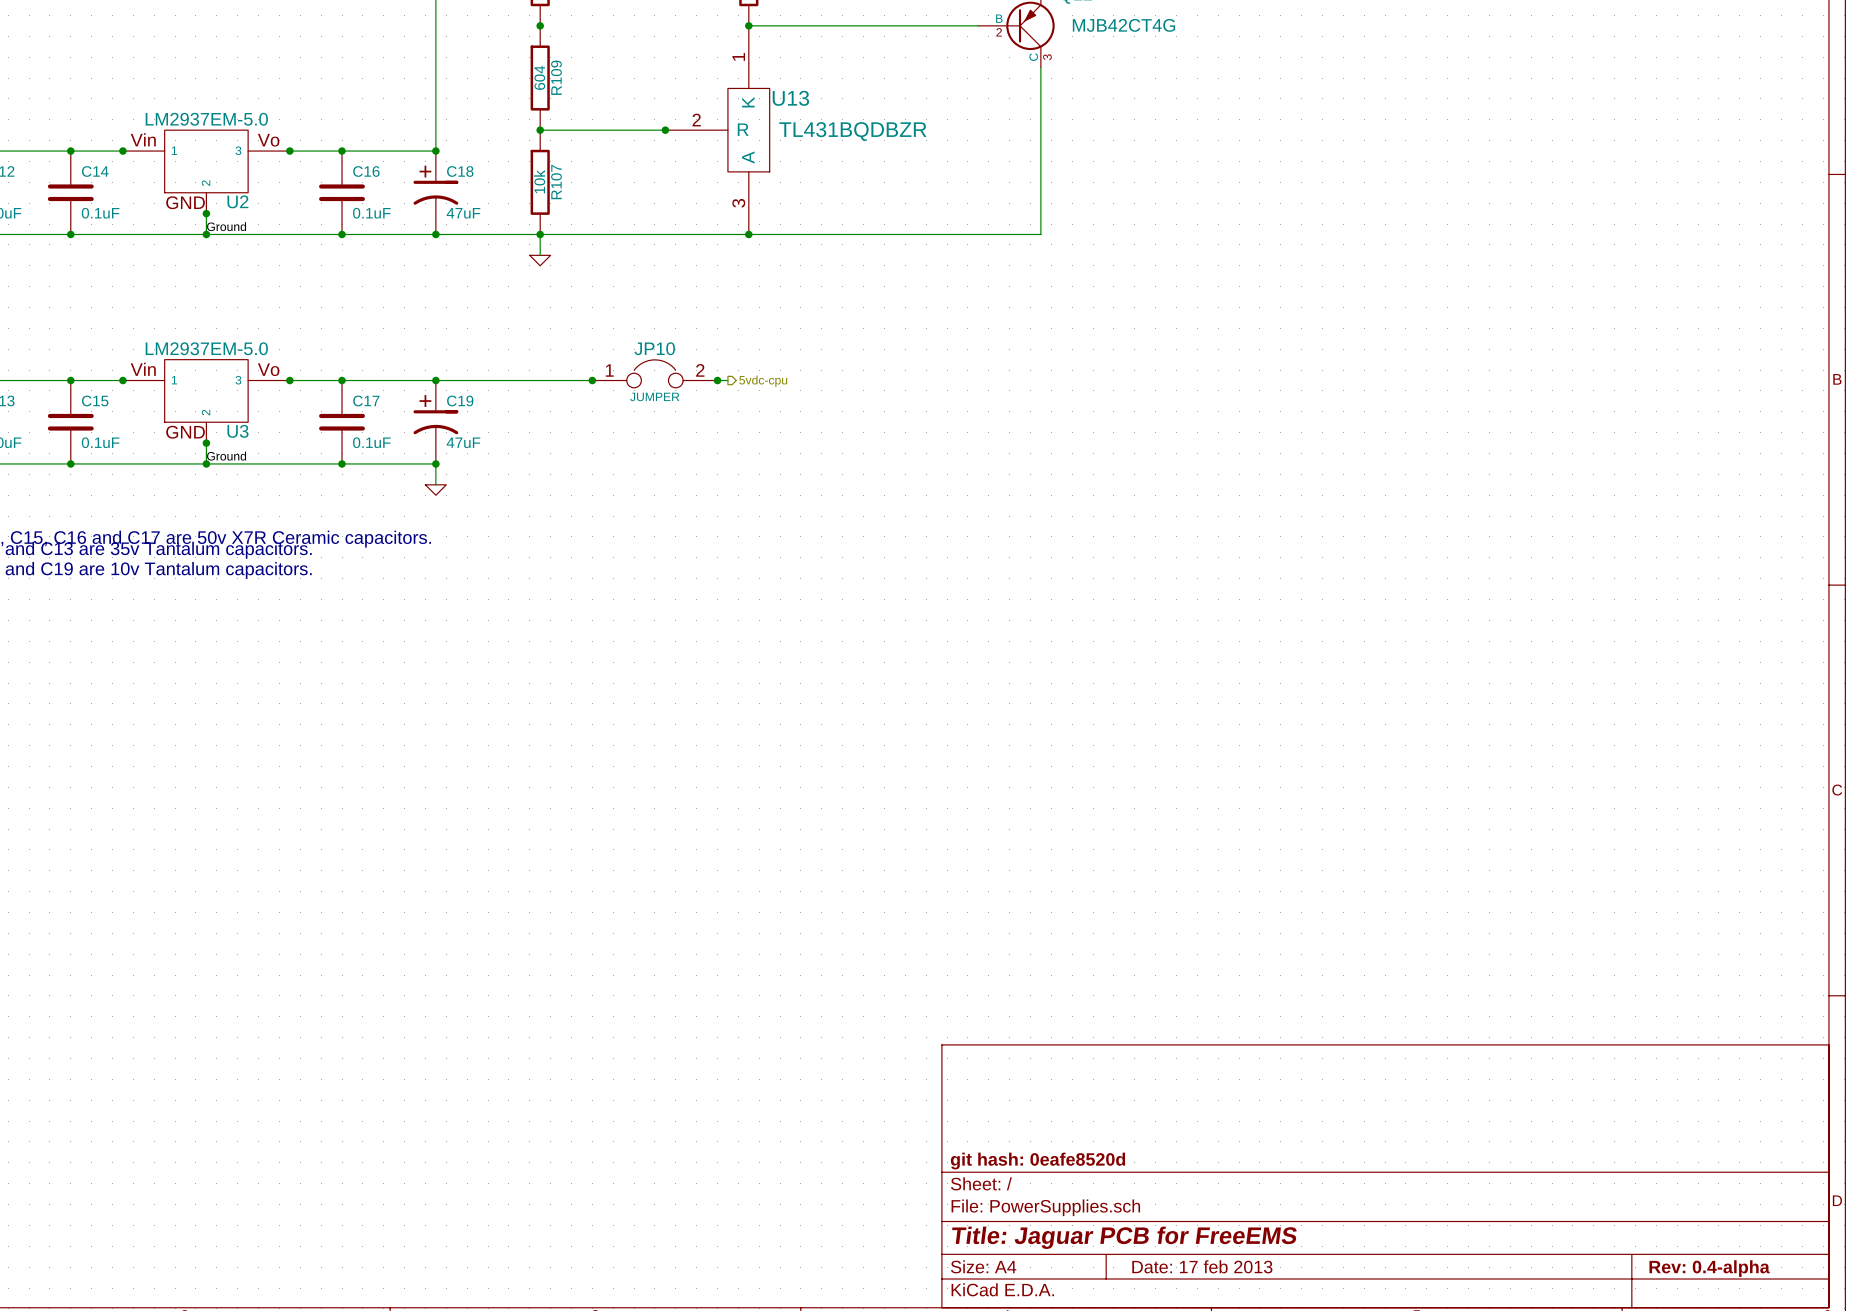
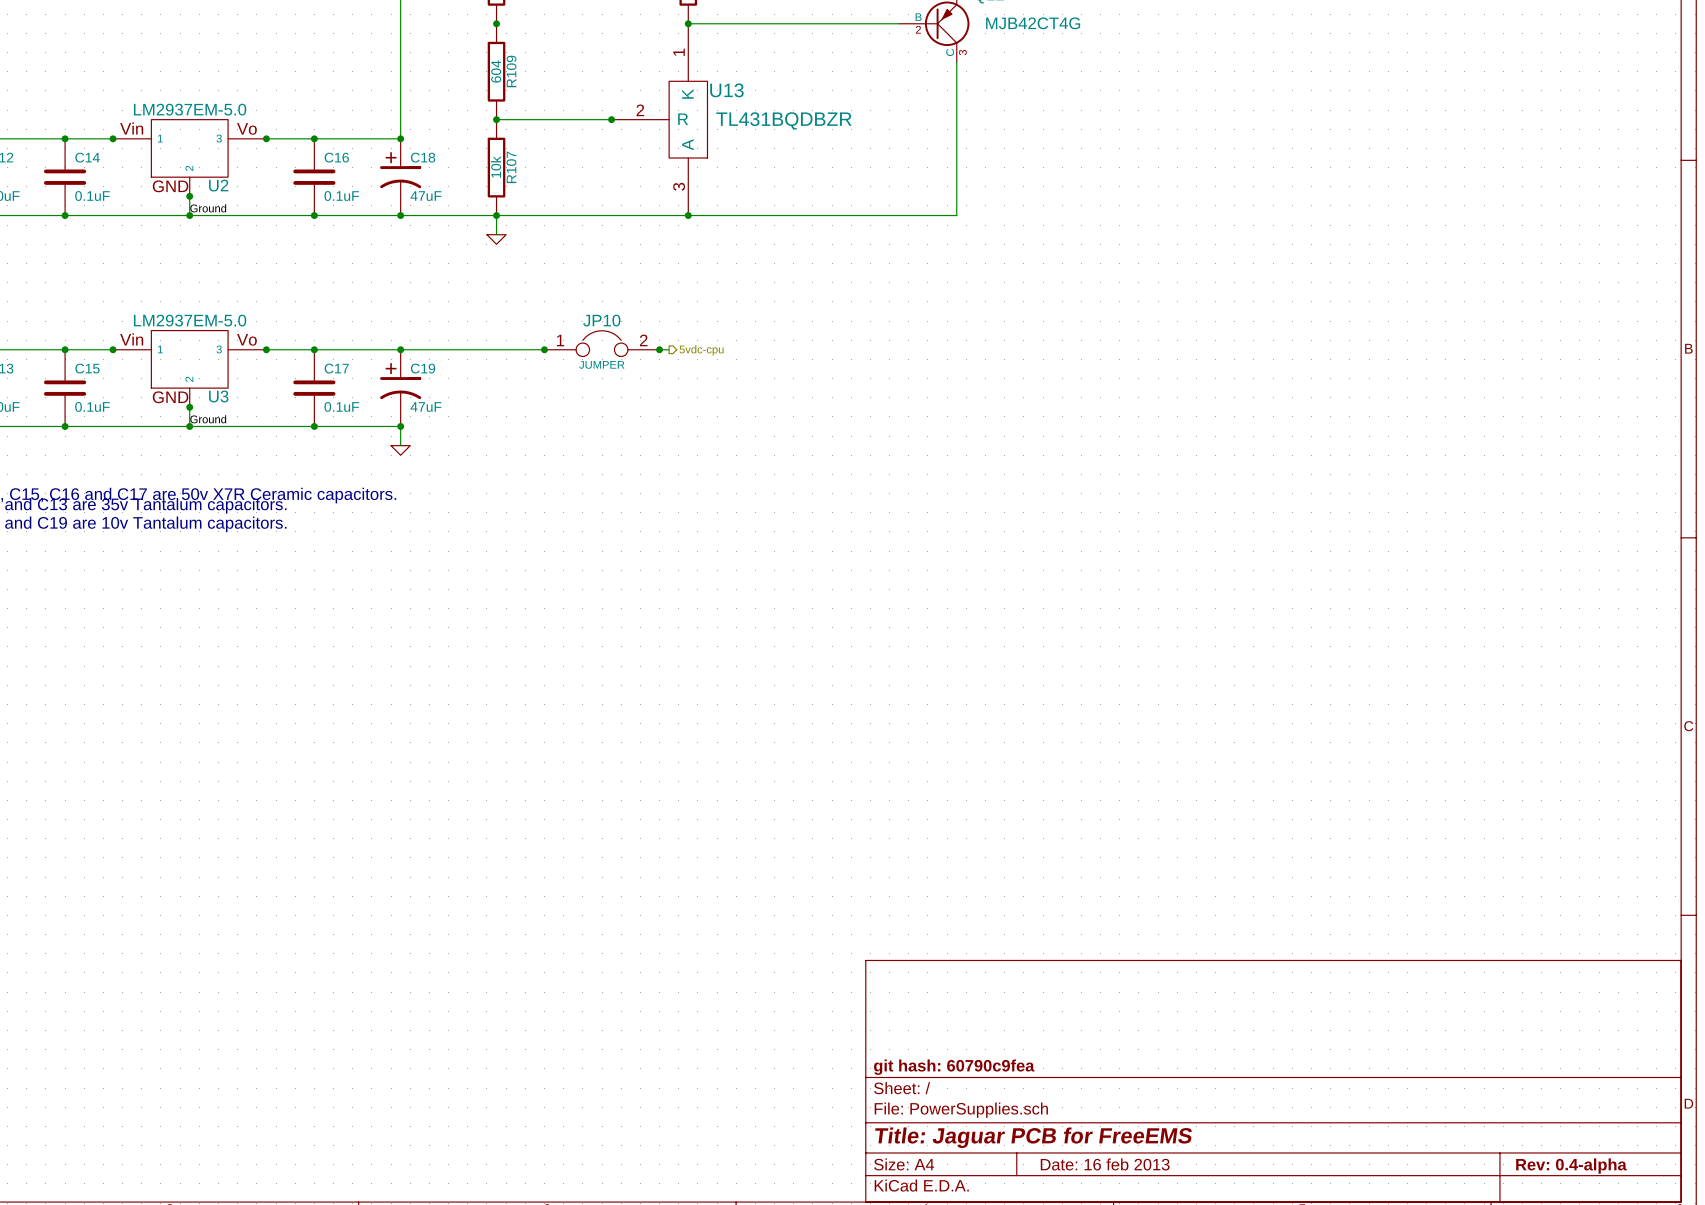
title block: git hash: 0eafe8520d (1037, 1161) -> git hash: 60790c9fea (954, 1067)
title block: Date: 17 feb 2013 (1202, 1266) -> Date: 16 feb 2013 (1105, 1164)

